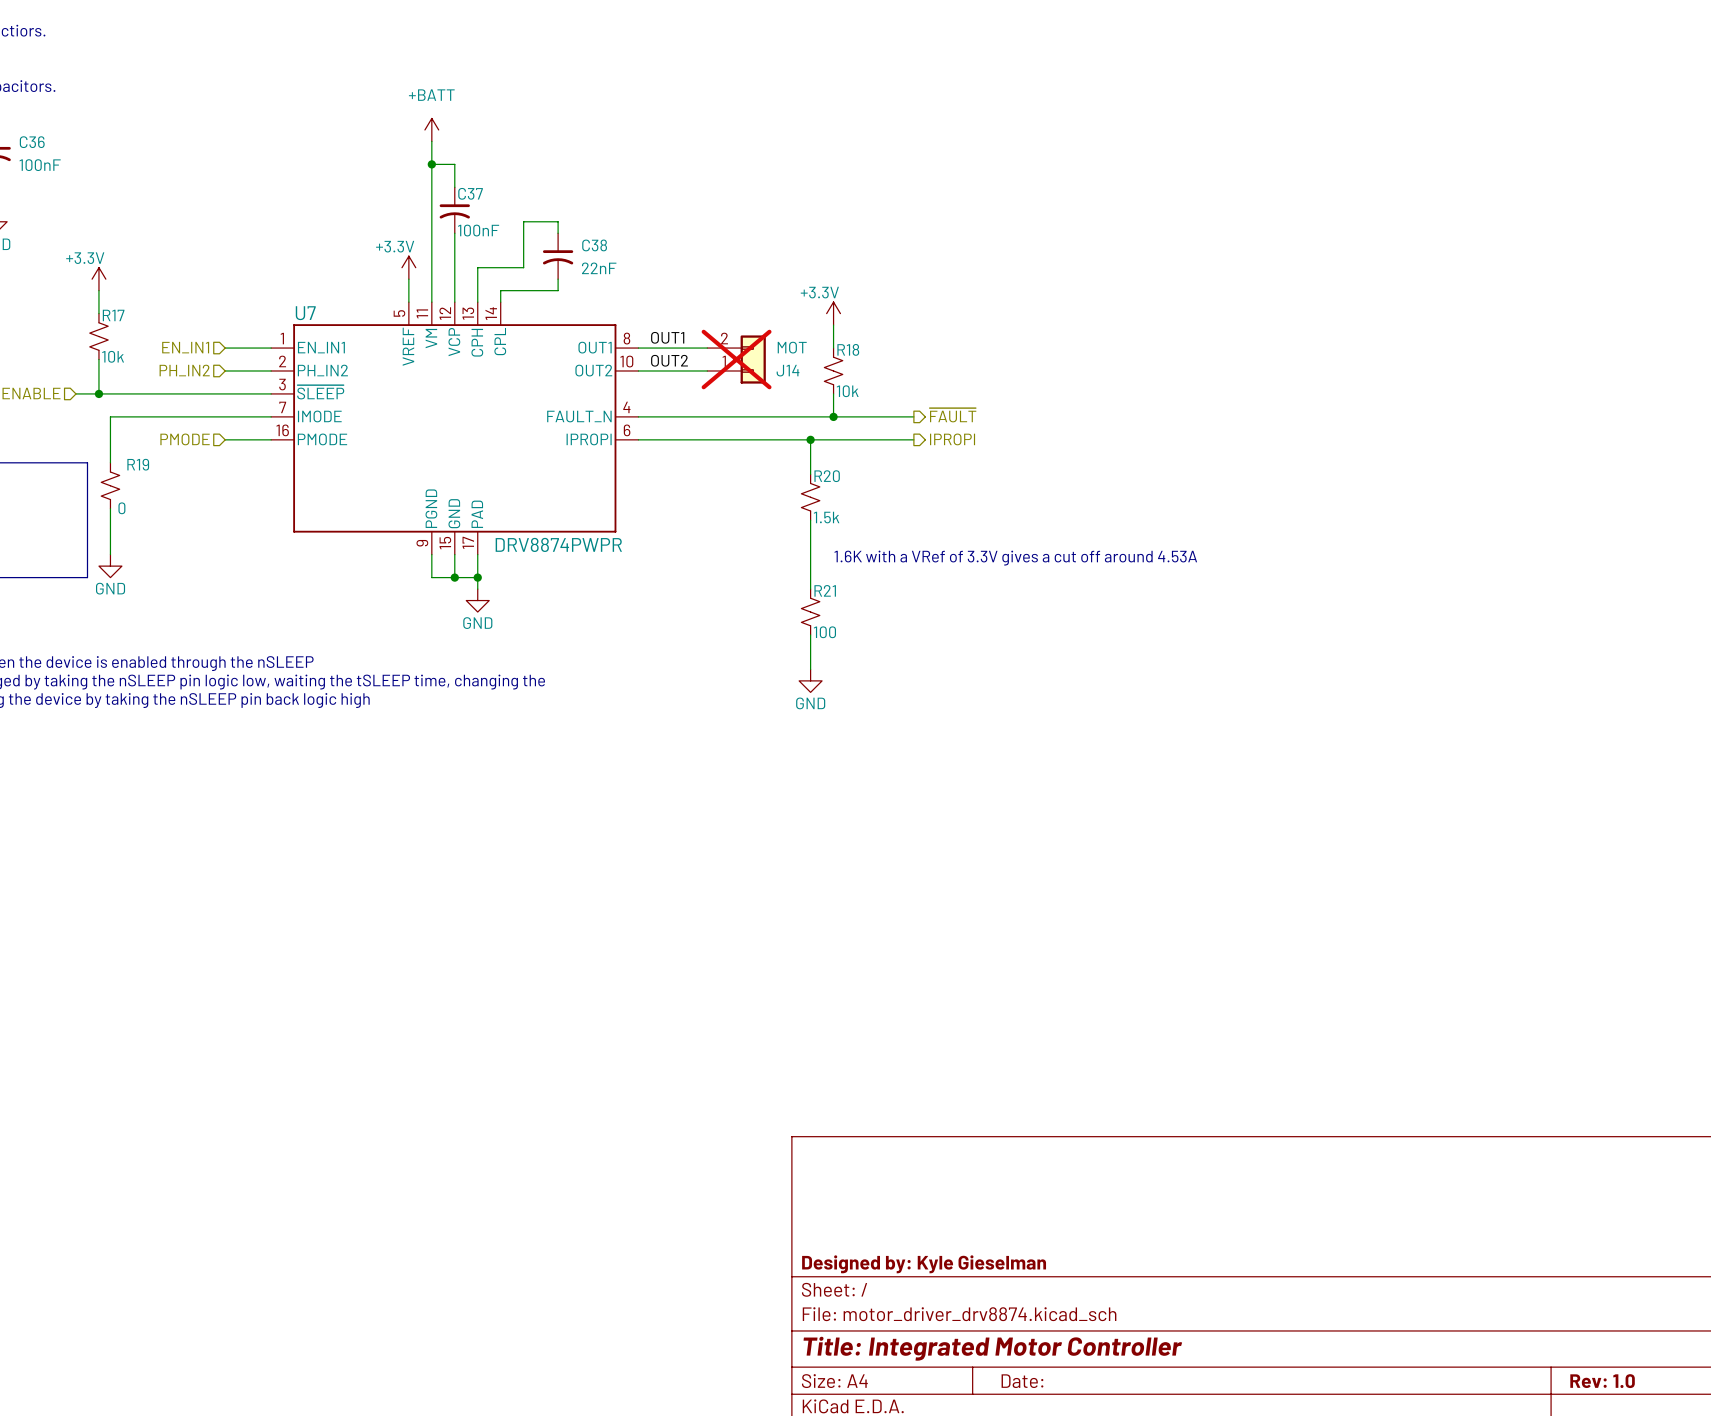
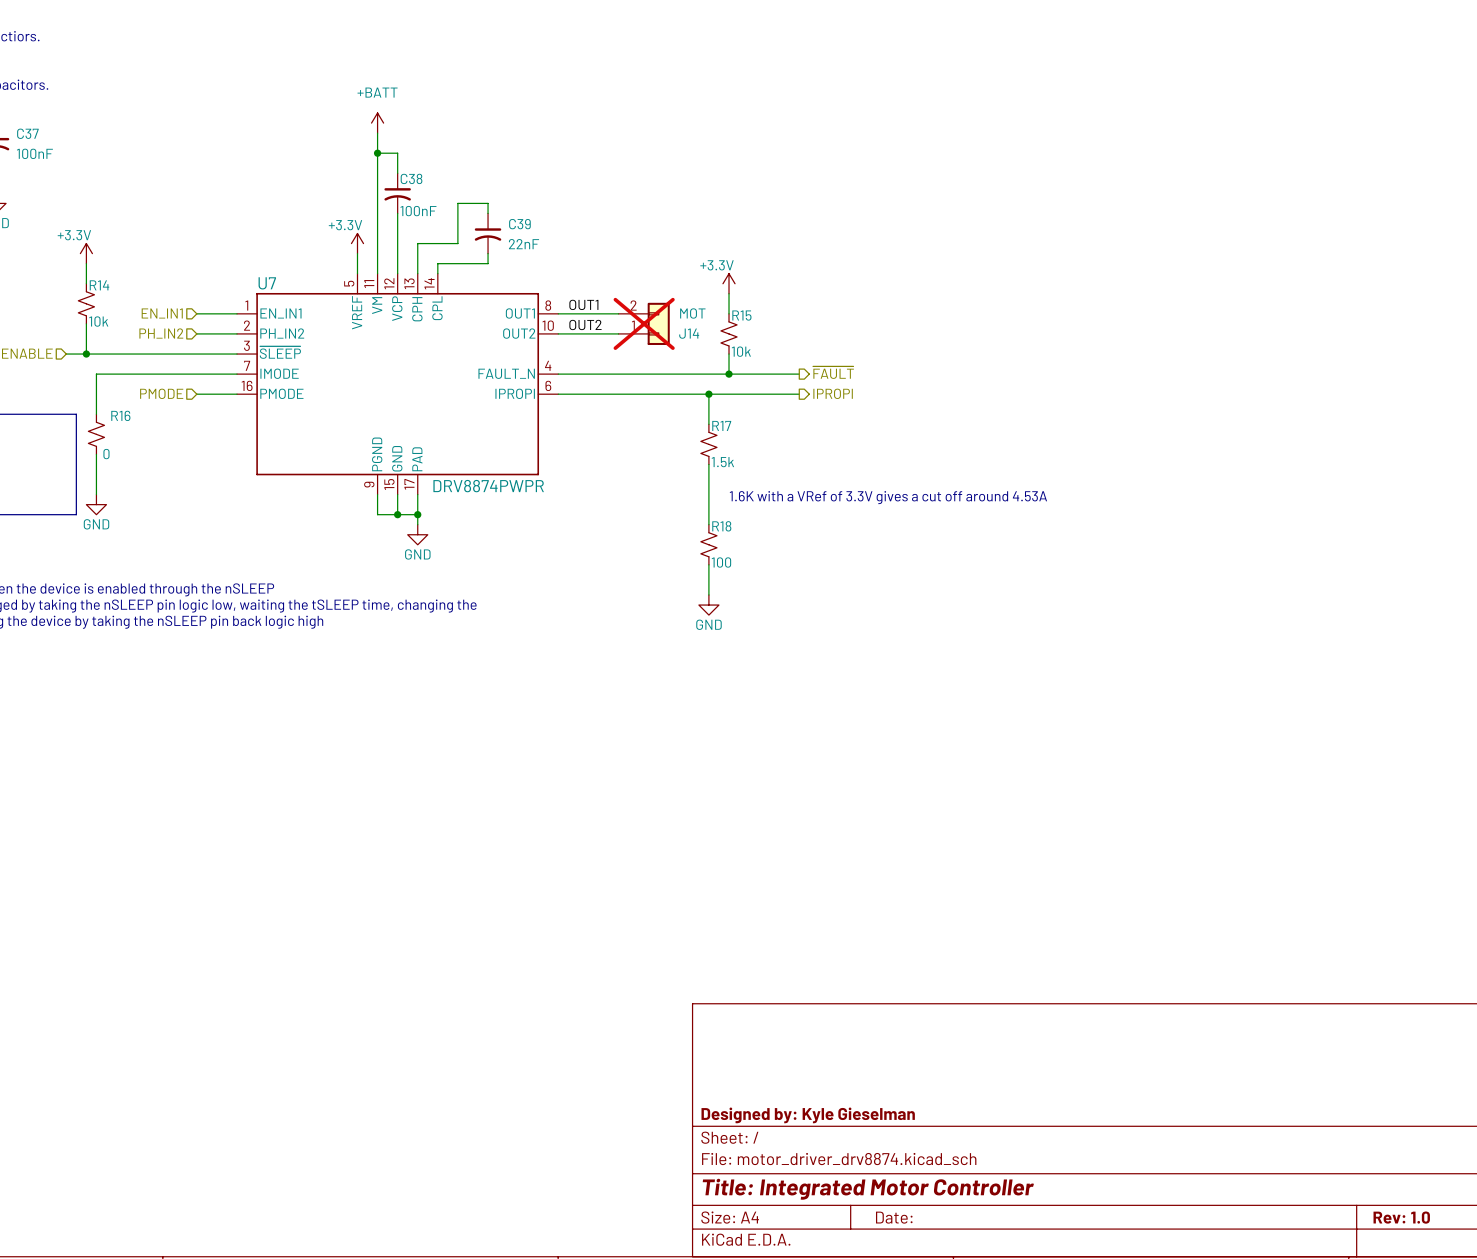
C36 name: C36 (32, 142) -> C37 (27, 133)
C37 name: C37 (470, 193) -> C38 (411, 178)
C38 name: C38 (594, 245) -> C39 (519, 224)
R17 name: R17 (113, 315) -> R14 (99, 285)
R18 name: R18 (848, 349) -> R15 (741, 315)
R19 name: R19 (138, 464) -> R16 (120, 415)
R20 name: R20 (827, 476) -> R17 (721, 425)
R21 name: R21 (825, 590) -> R18 (721, 526)

